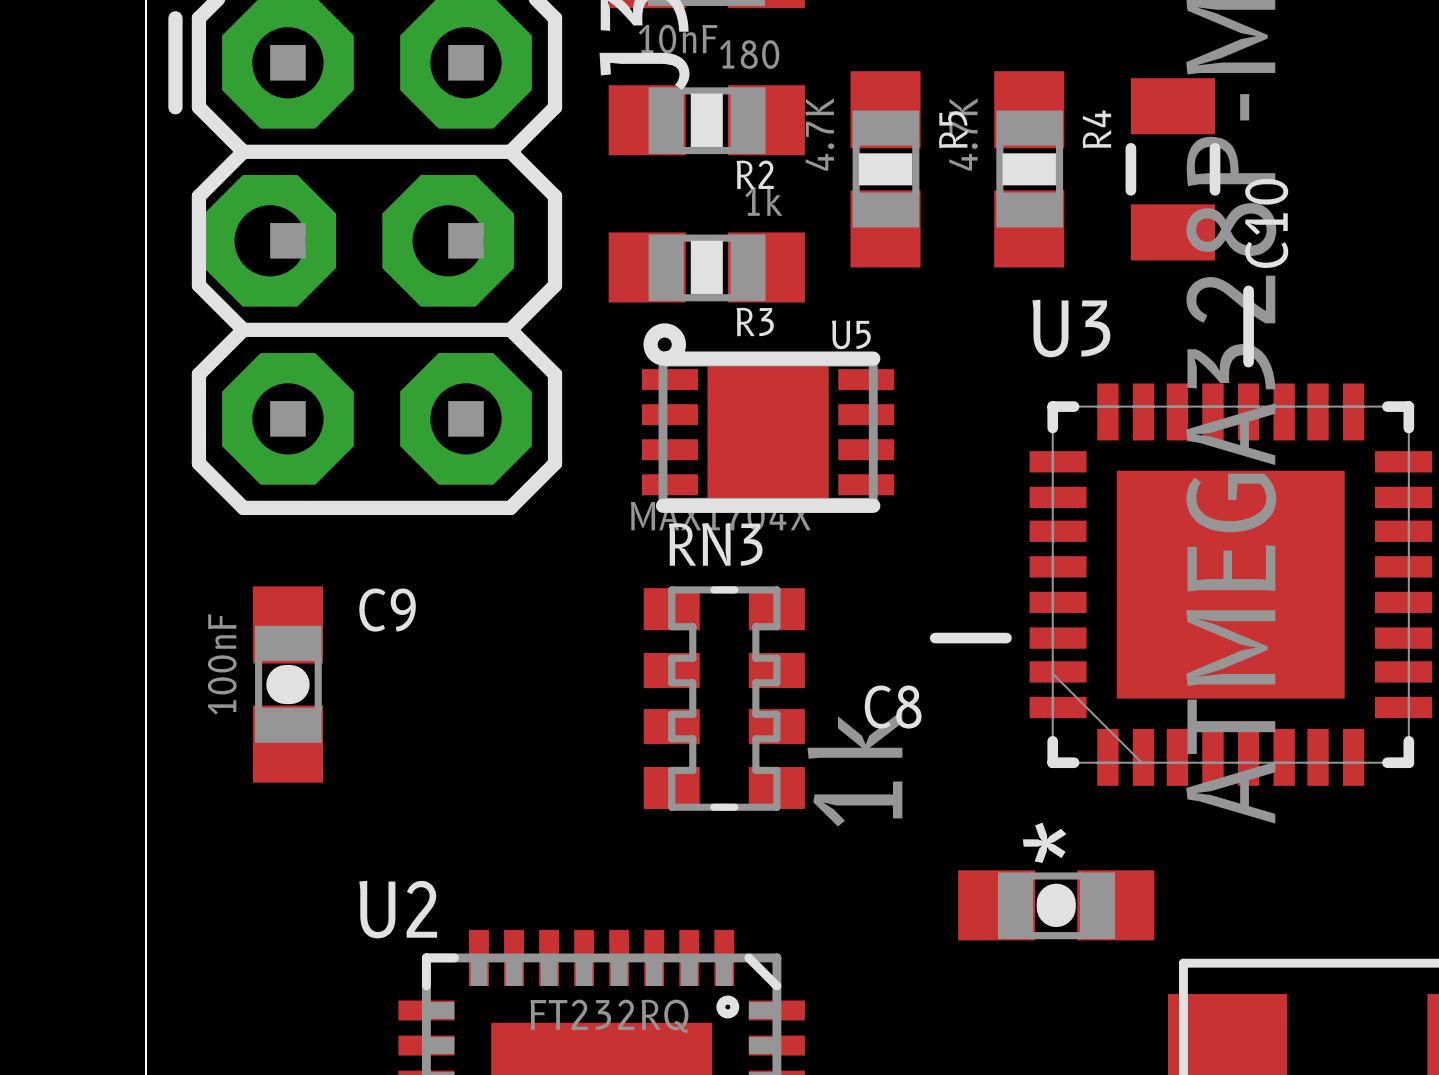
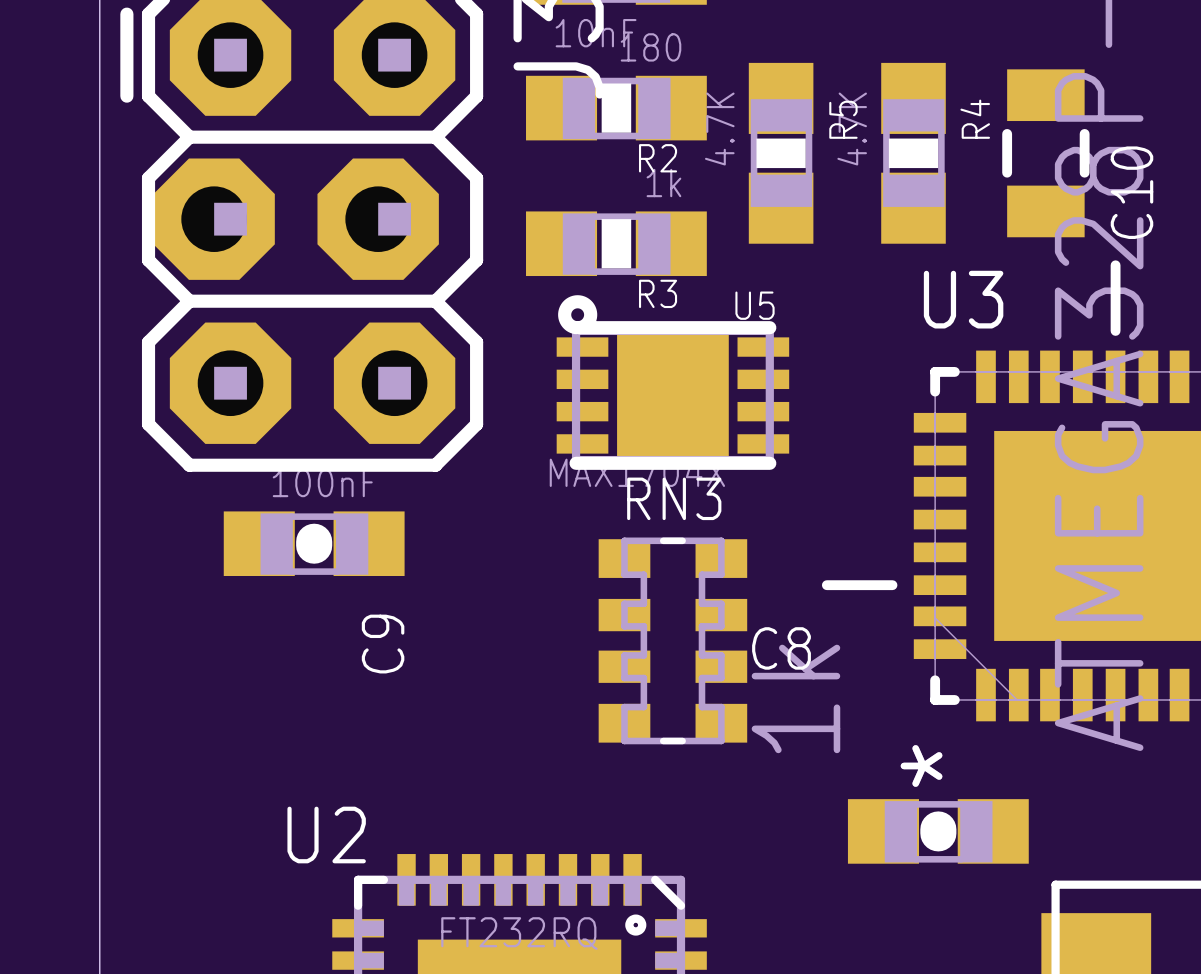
C9 rotation: 0° (287, 684) -> 90° clockwise (314, 543)
C9 position: (287, 684) -> (314, 543)
RN3 position: (724, 698) -> (672, 640)

